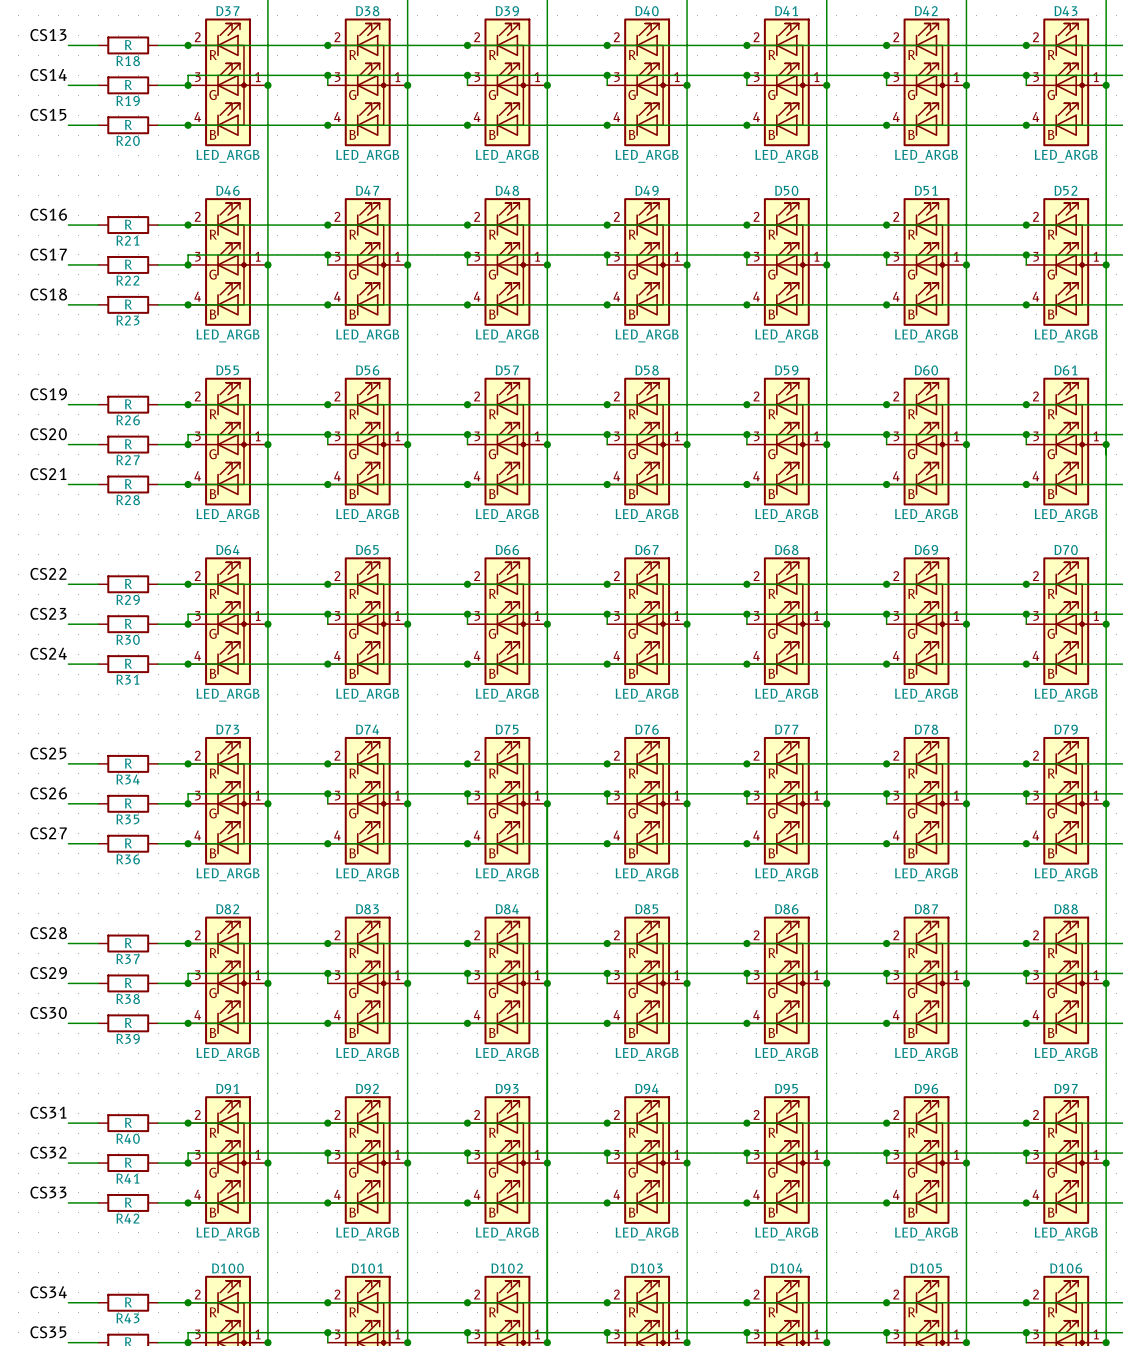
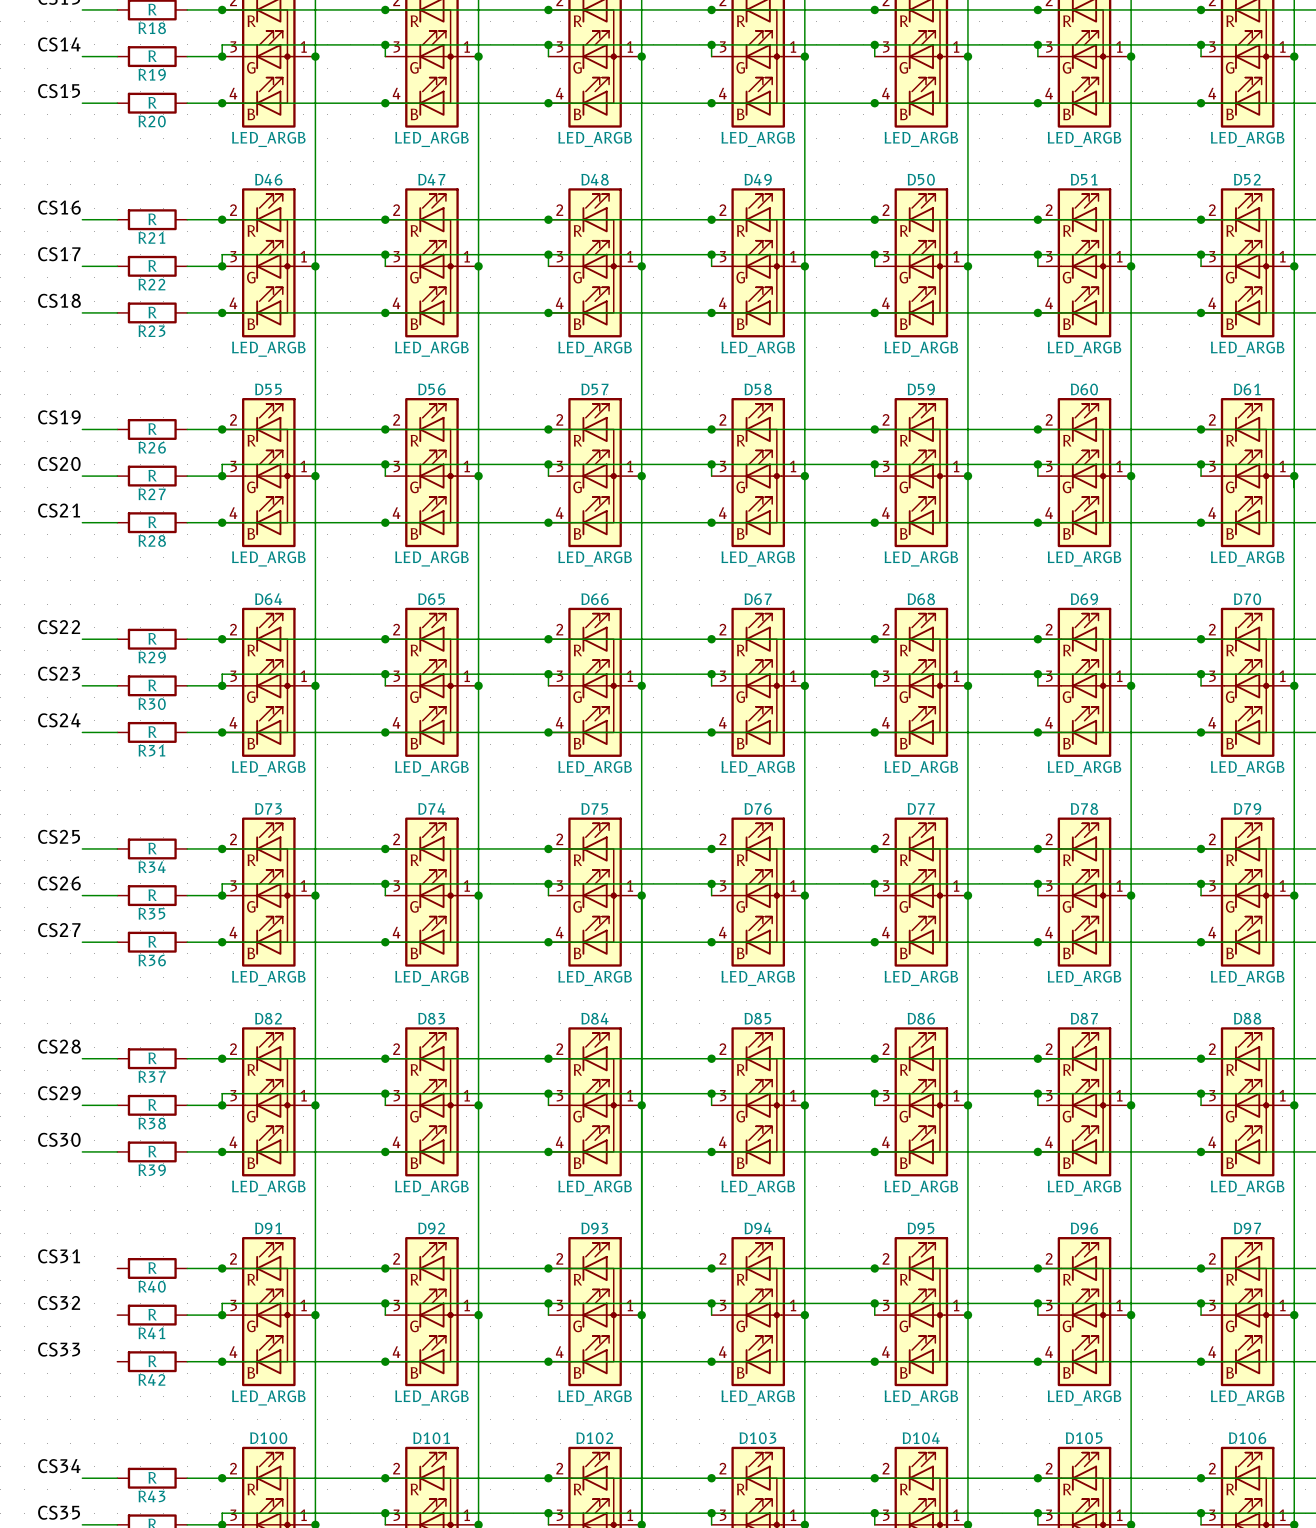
wire: (68, 1123) (98, 1123) -> none
wire: (68, 1163) (98, 1163) -> none
wire: (68, 1202) (98, 1202) -> none

